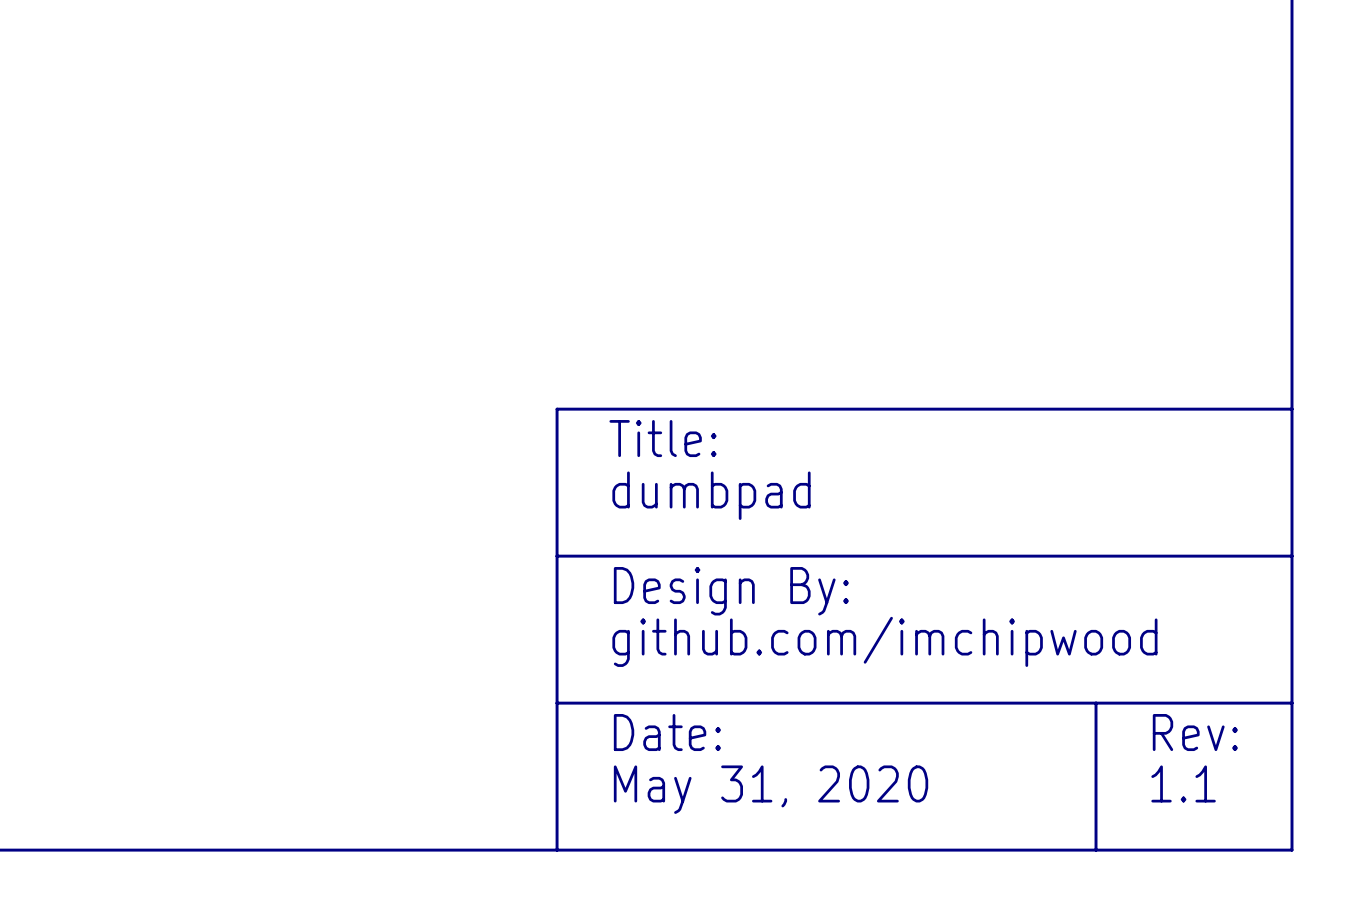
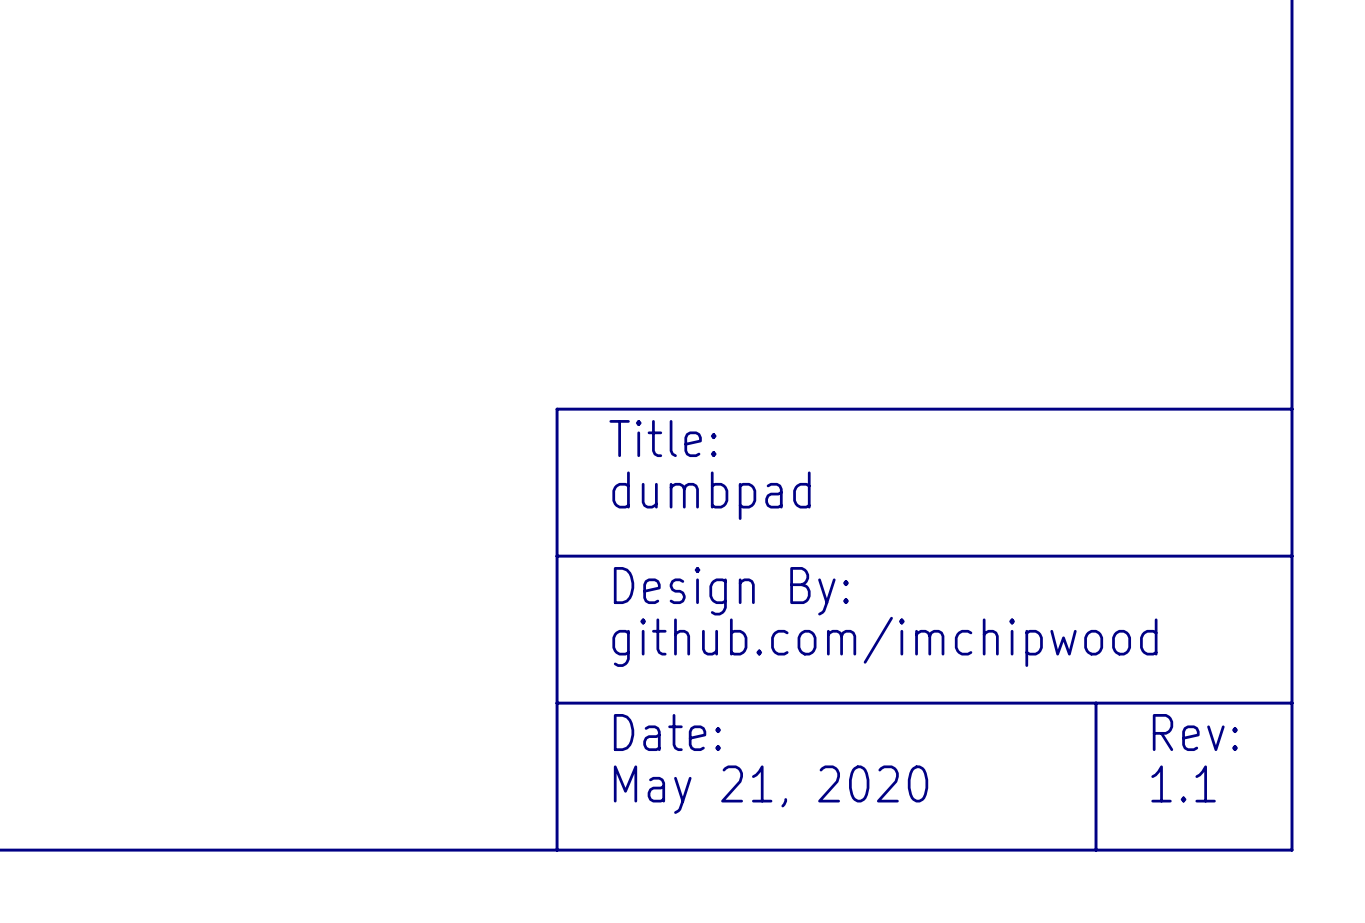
text: May 31, 2020 (771, 789) -> May 21, 2020 (771, 789)

